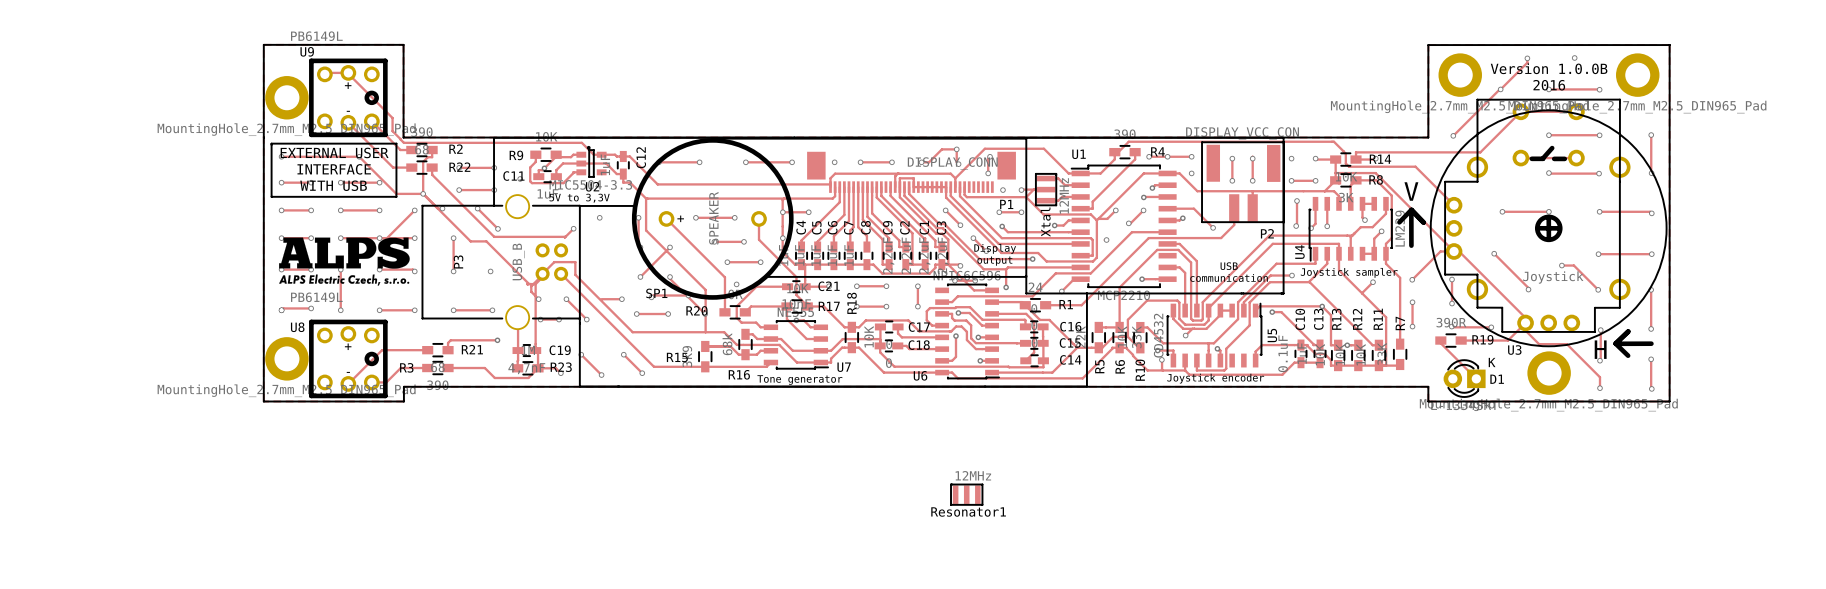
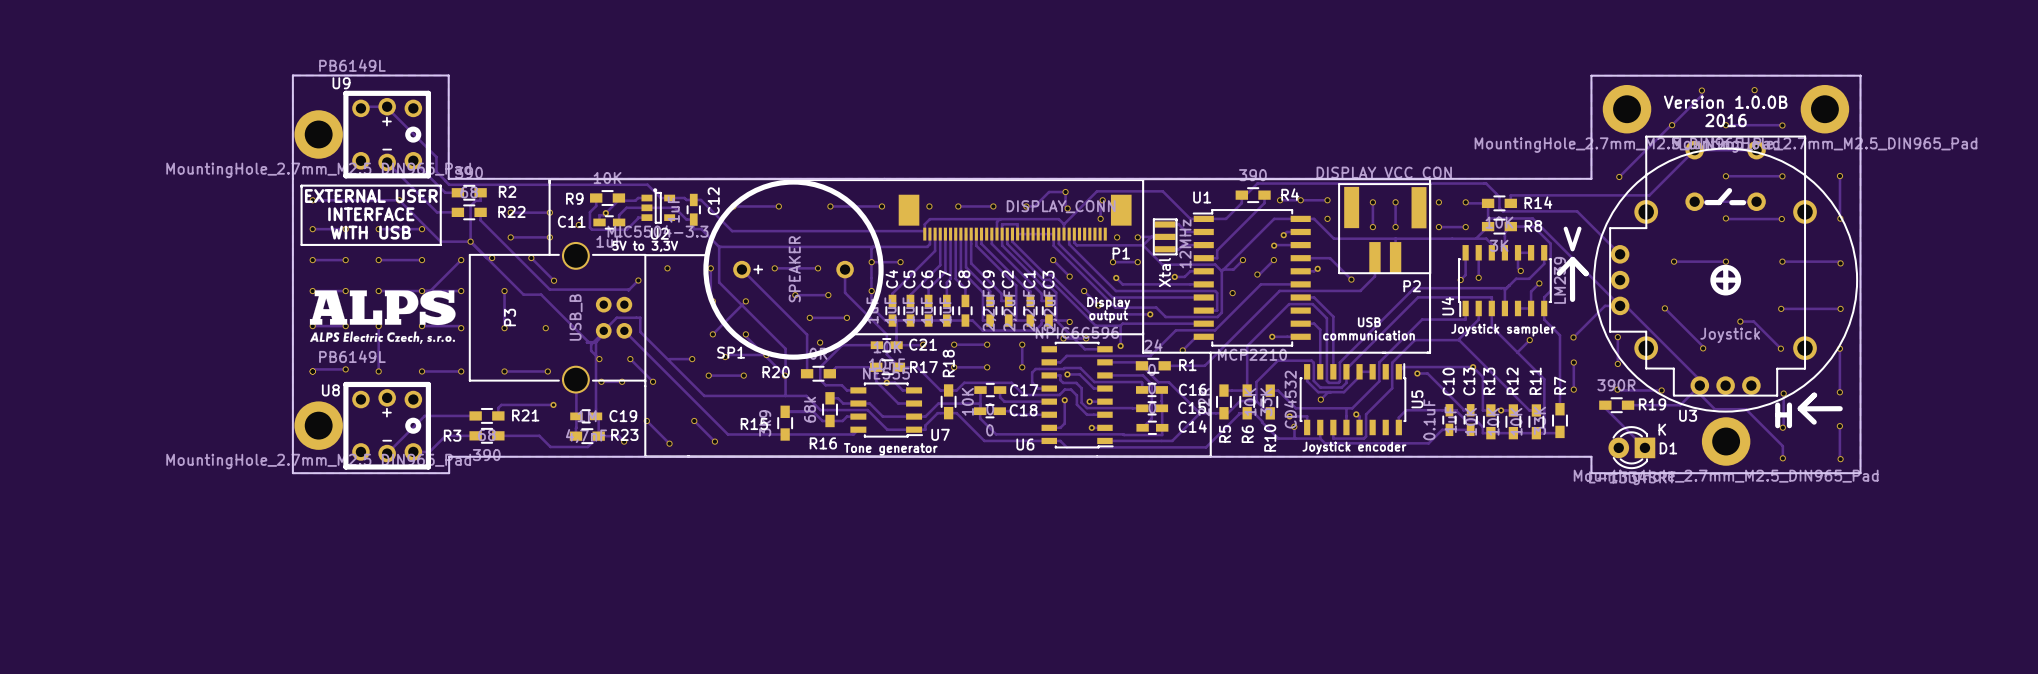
track: (1375, 158) (1356, 159) -> none
via: (1375, 158) -> none
track: (1297, 200) (1296, 226) -> none
via: (1297, 200) -> none
via: (1296, 226) -> none
track: (1292, 275) (1270, 275) (1243, 302) (1243, 310) -> none
via: (1292, 275) -> none
Resonator1: 12MHz (966, 494) -> none

